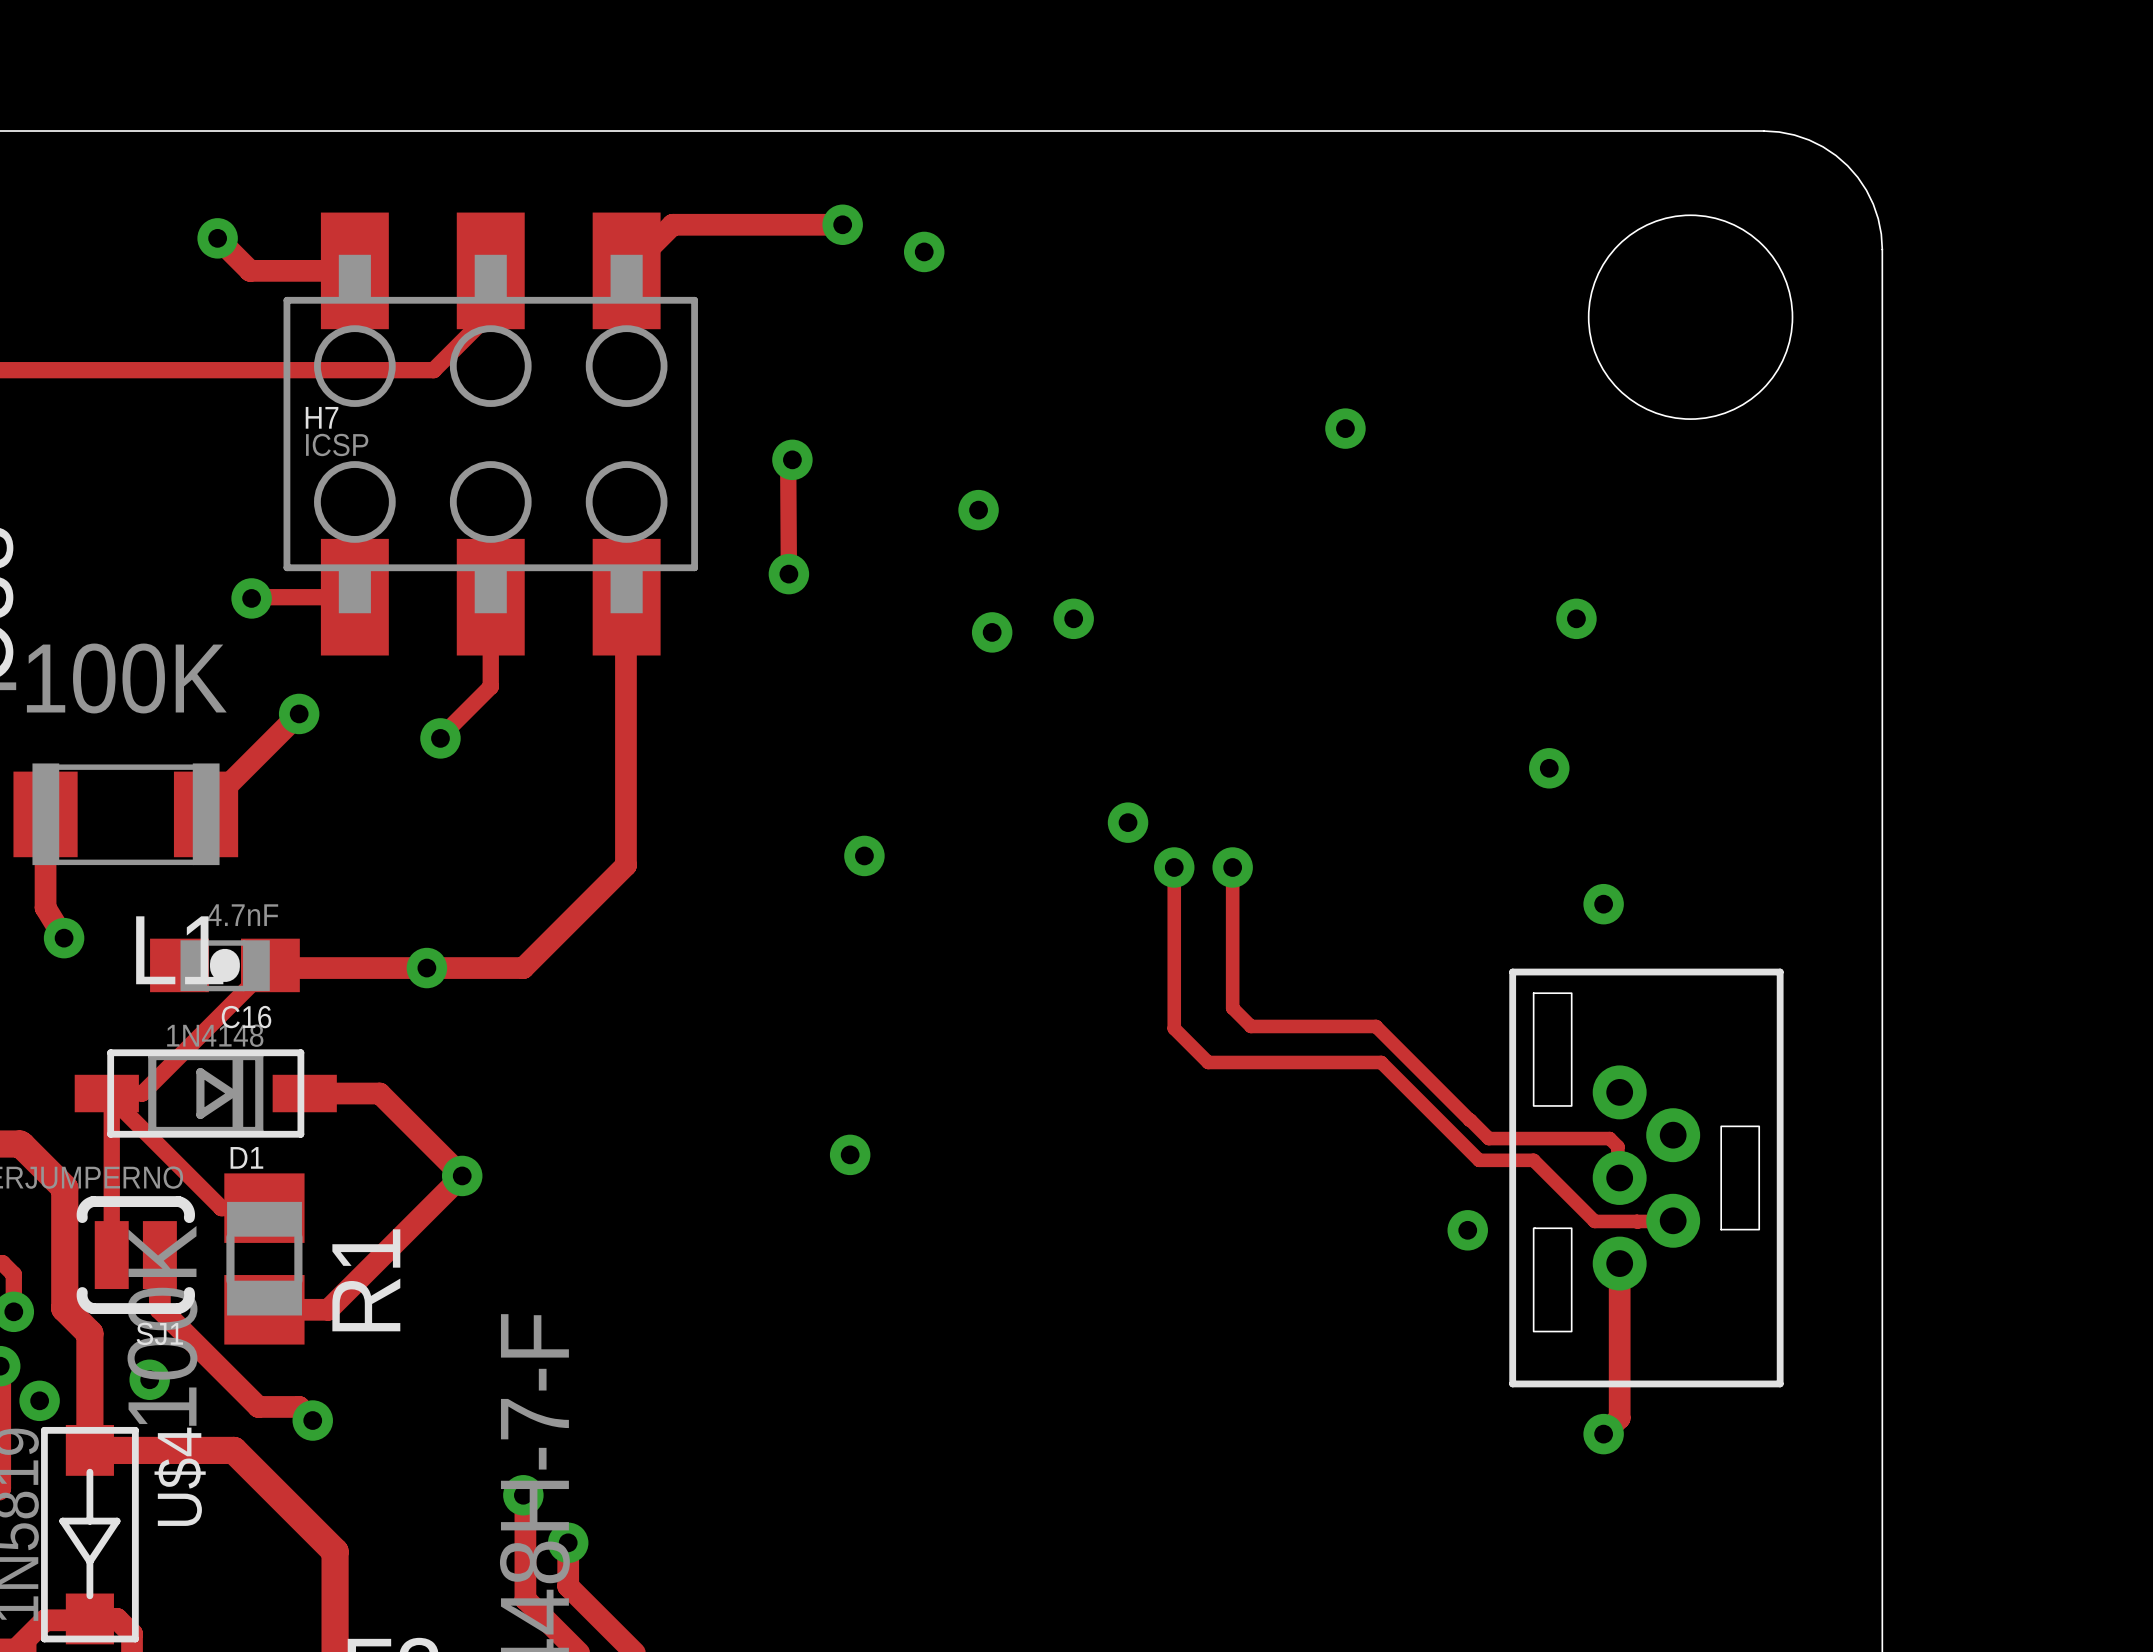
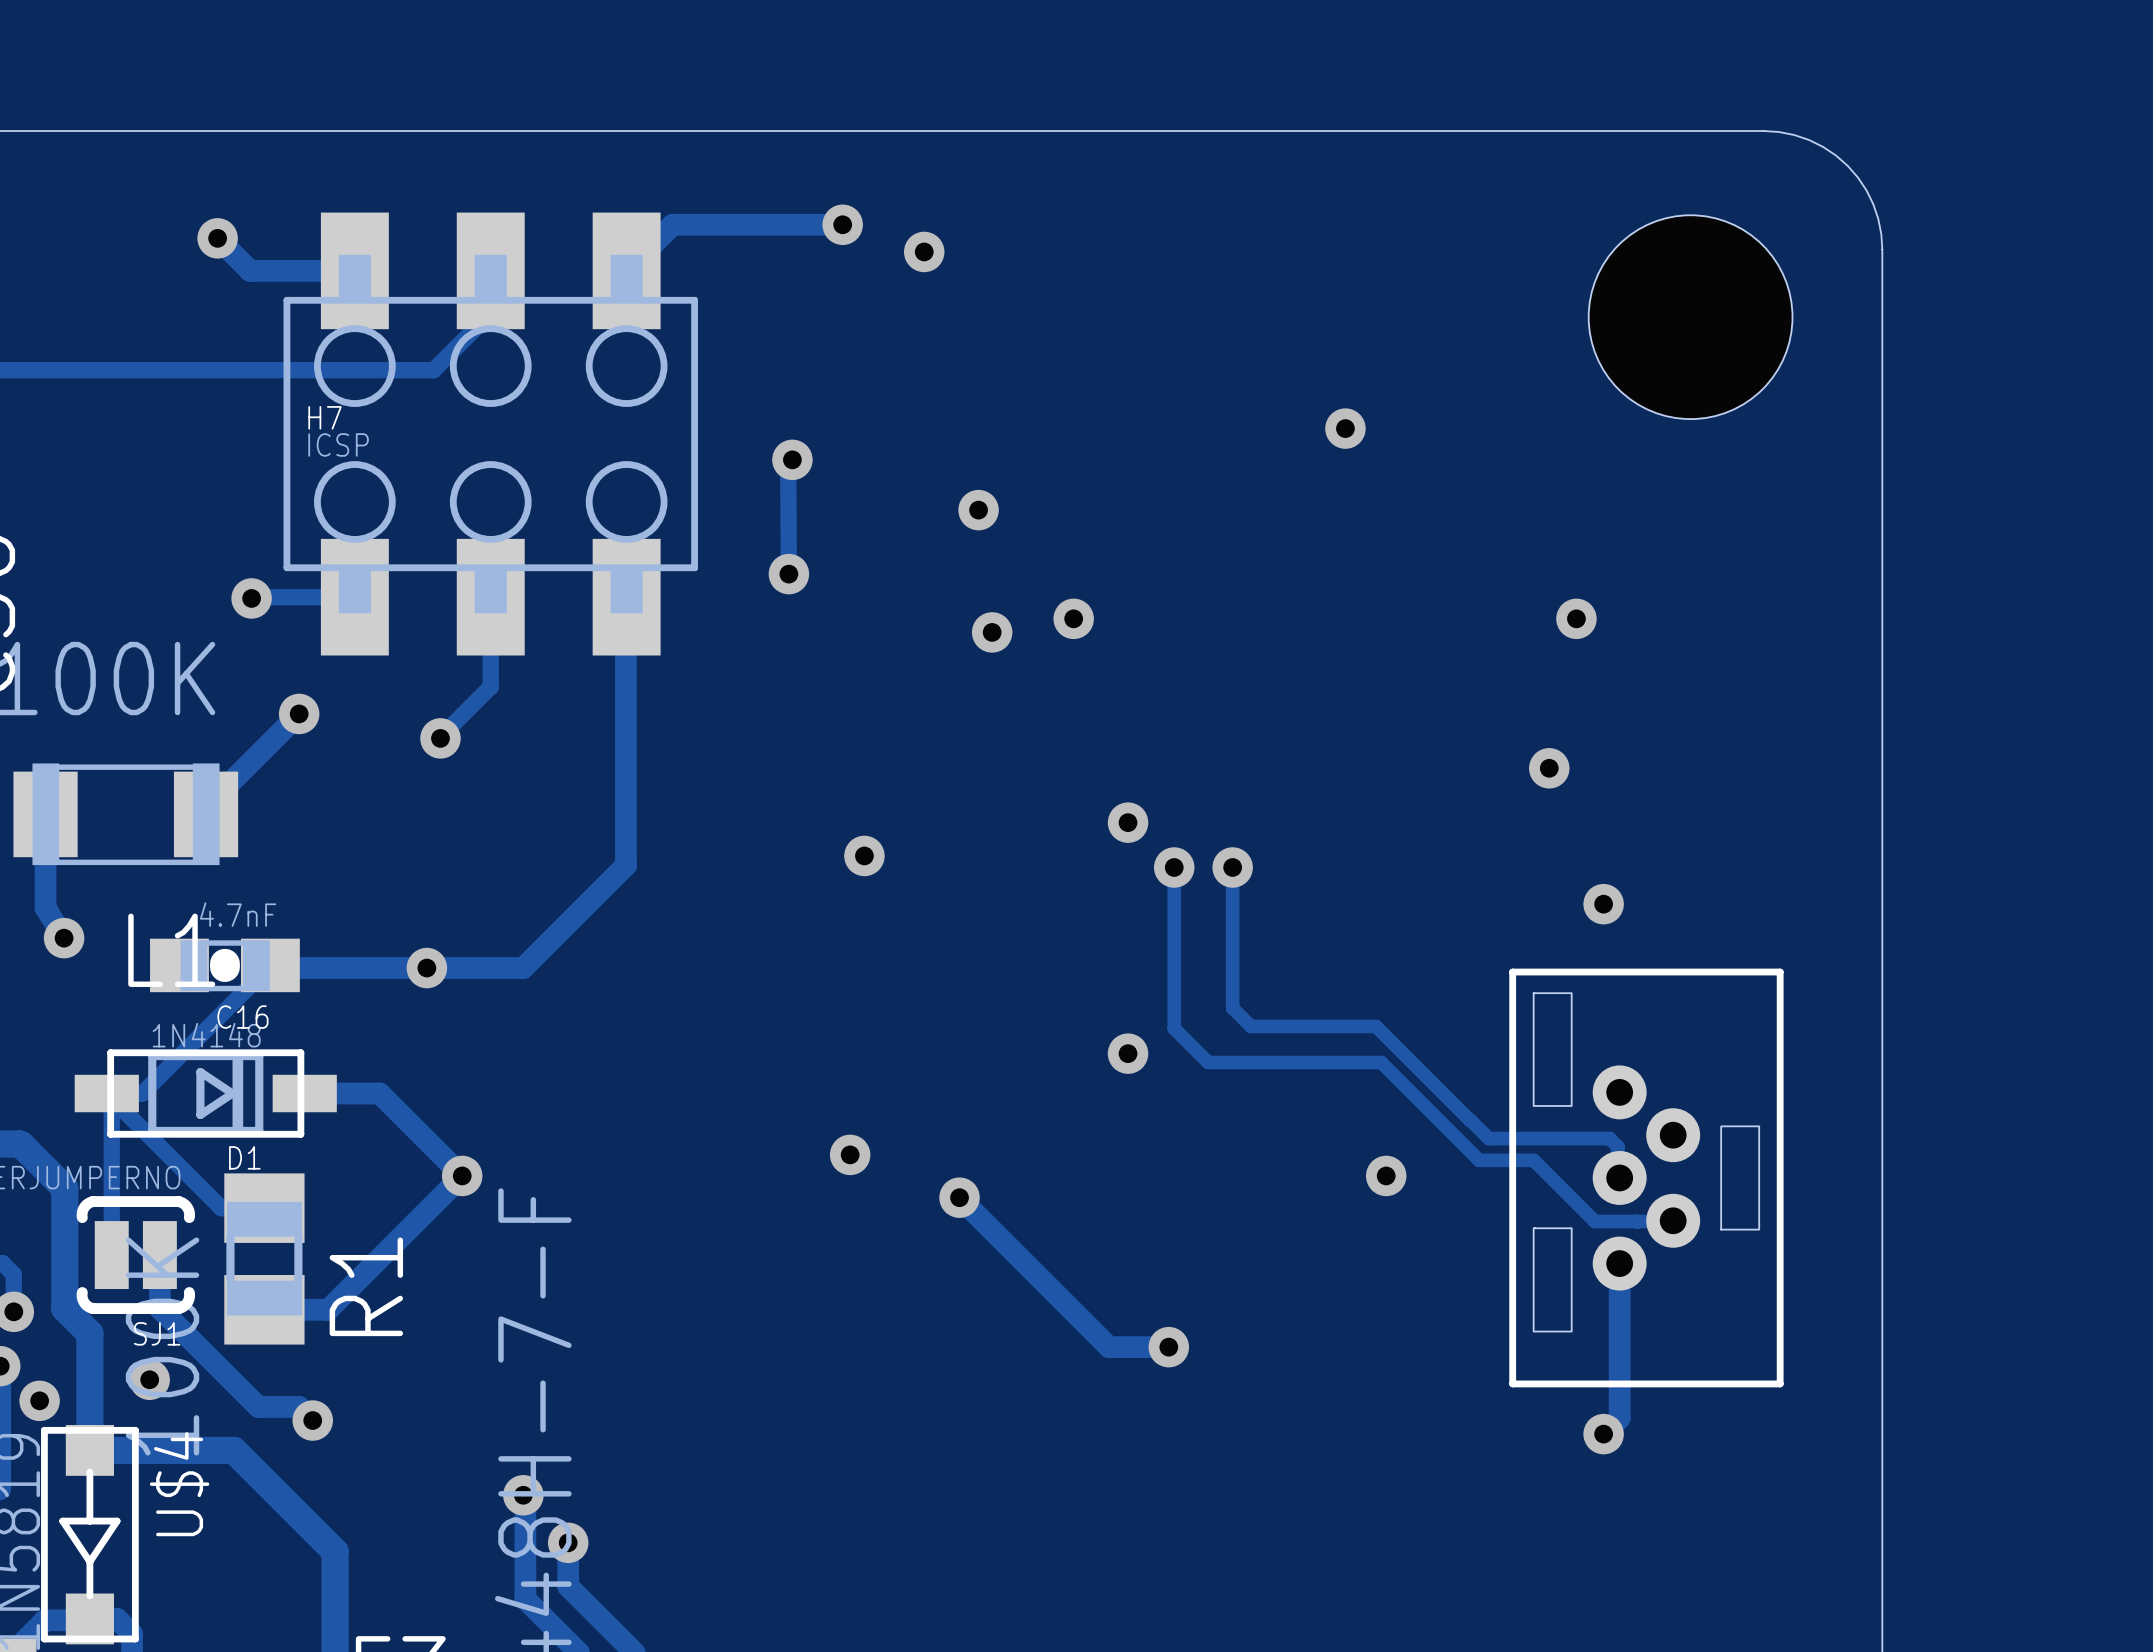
via: none -> (1128, 1053)
track: none -> (959, 1197) (1109, 1347) (1168, 1347)
via: none -> (959, 1197)
via position: (1467, 1230) -> (1386, 1175)
via: none -> (1168, 1347)

